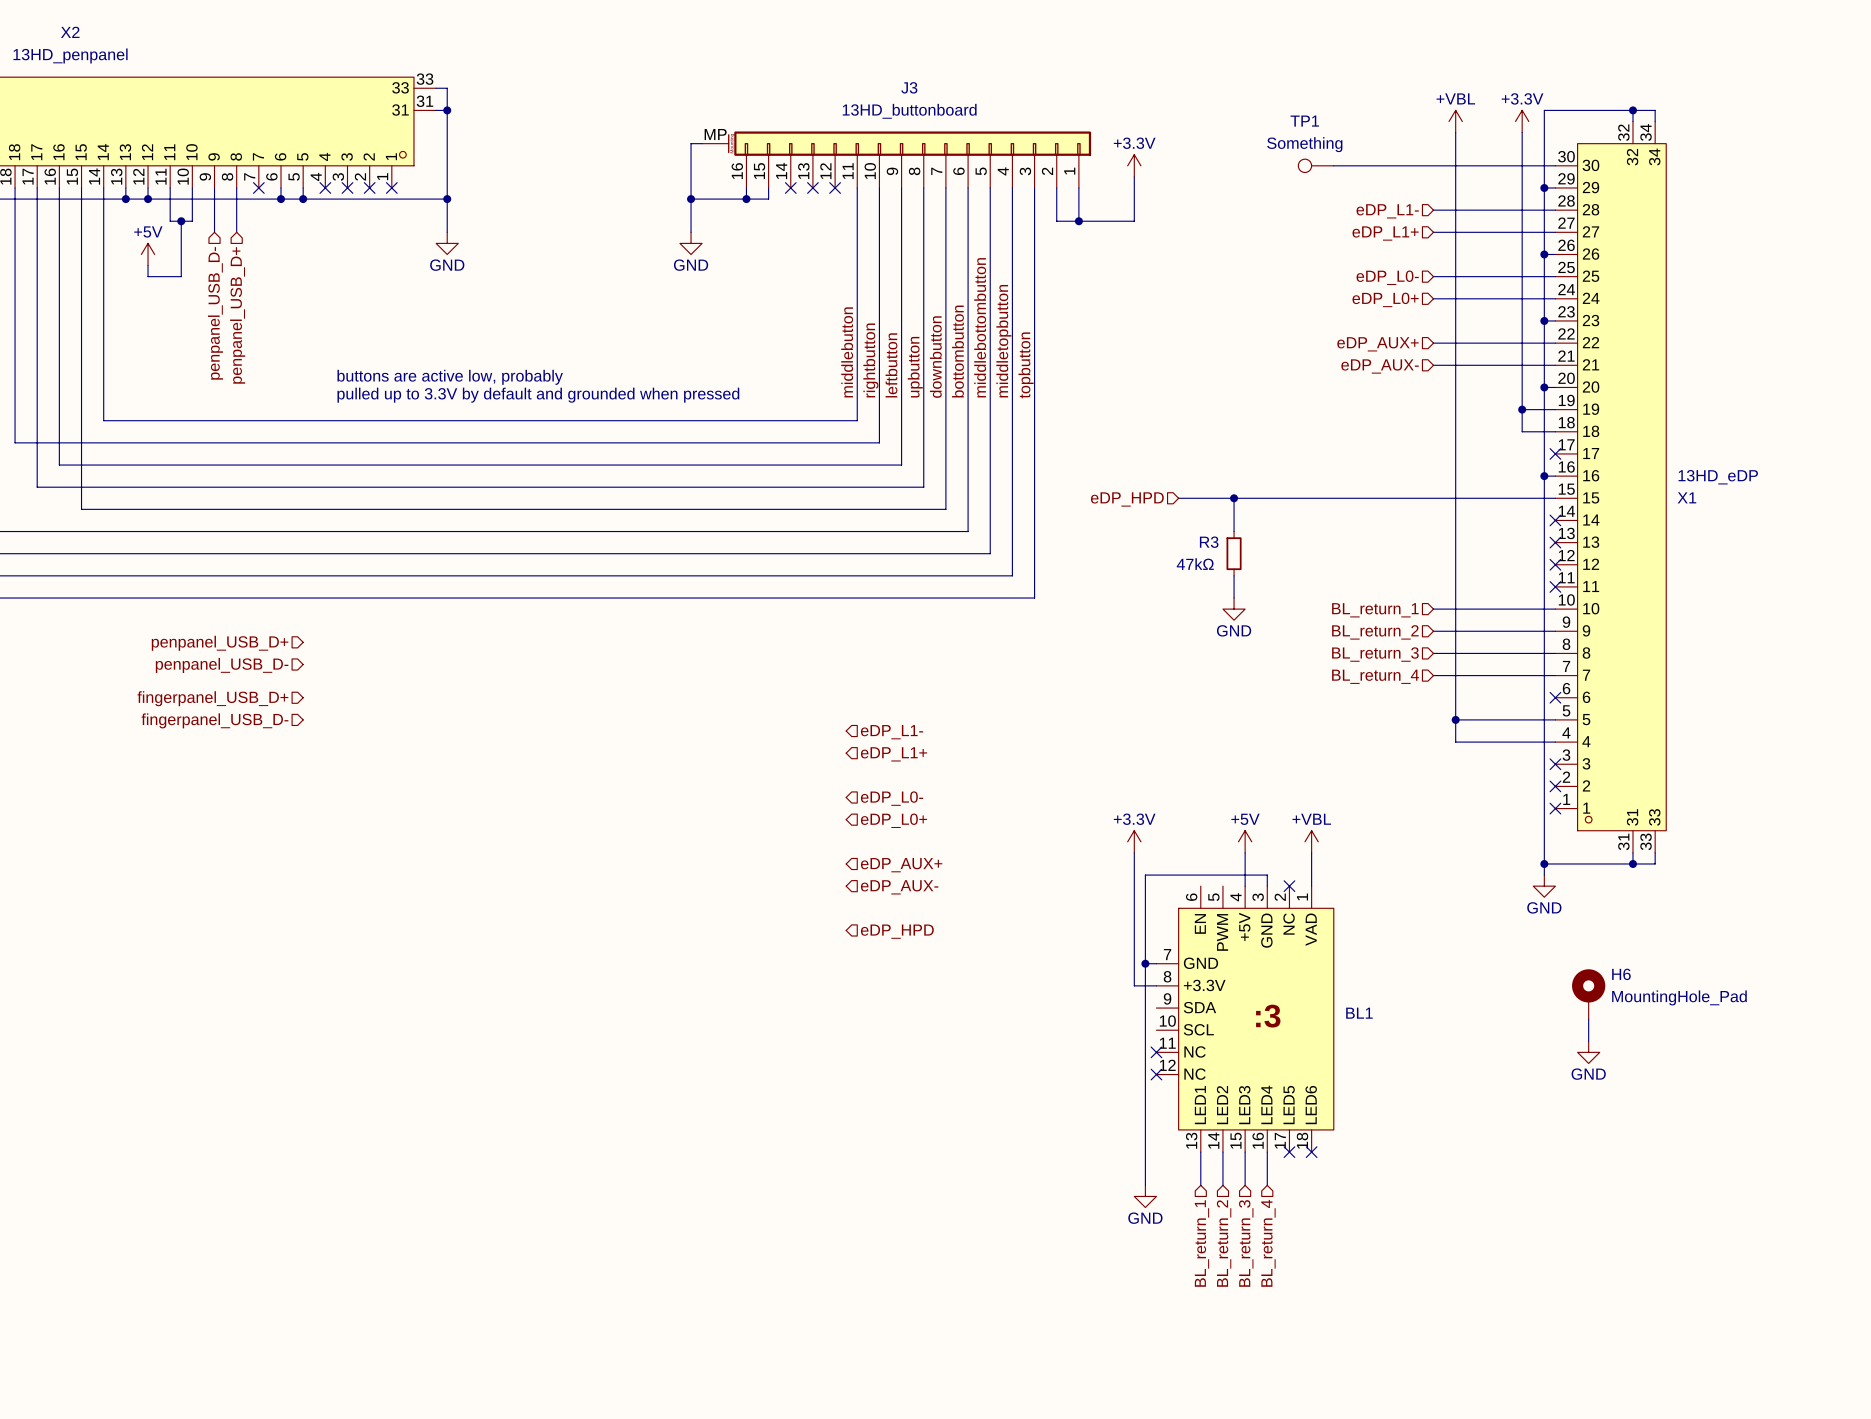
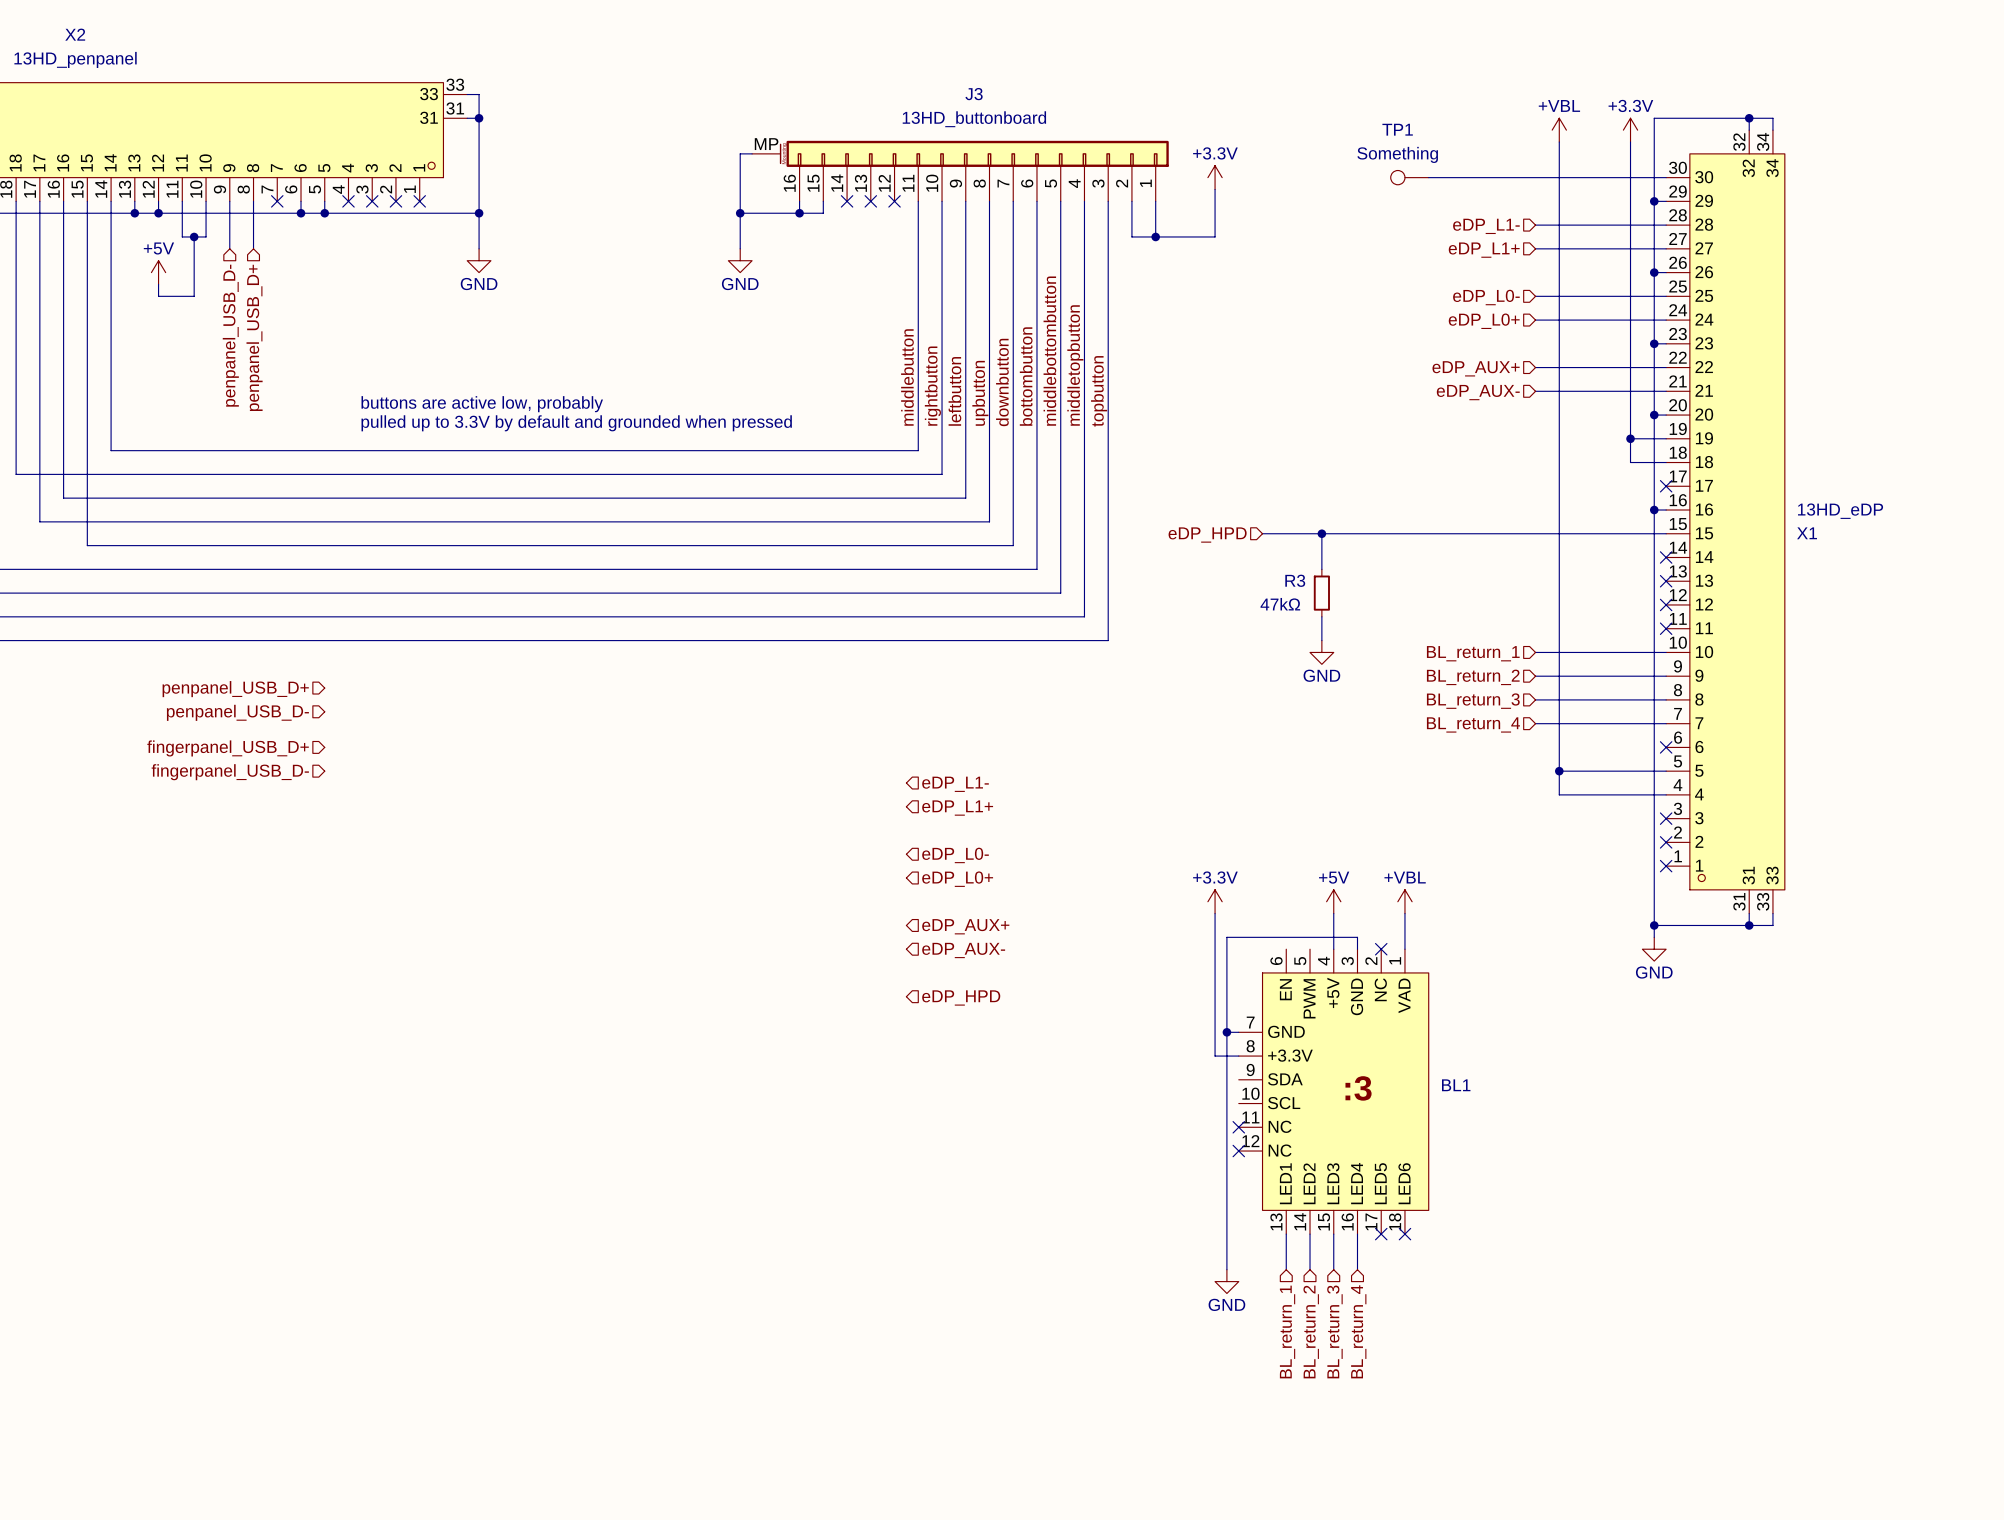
H6: MountingHole_Pad (1588, 994) -> none
wire: (1588, 1019) (1588, 1041) -> none
power symbol: GND (1588, 1052) -> none

